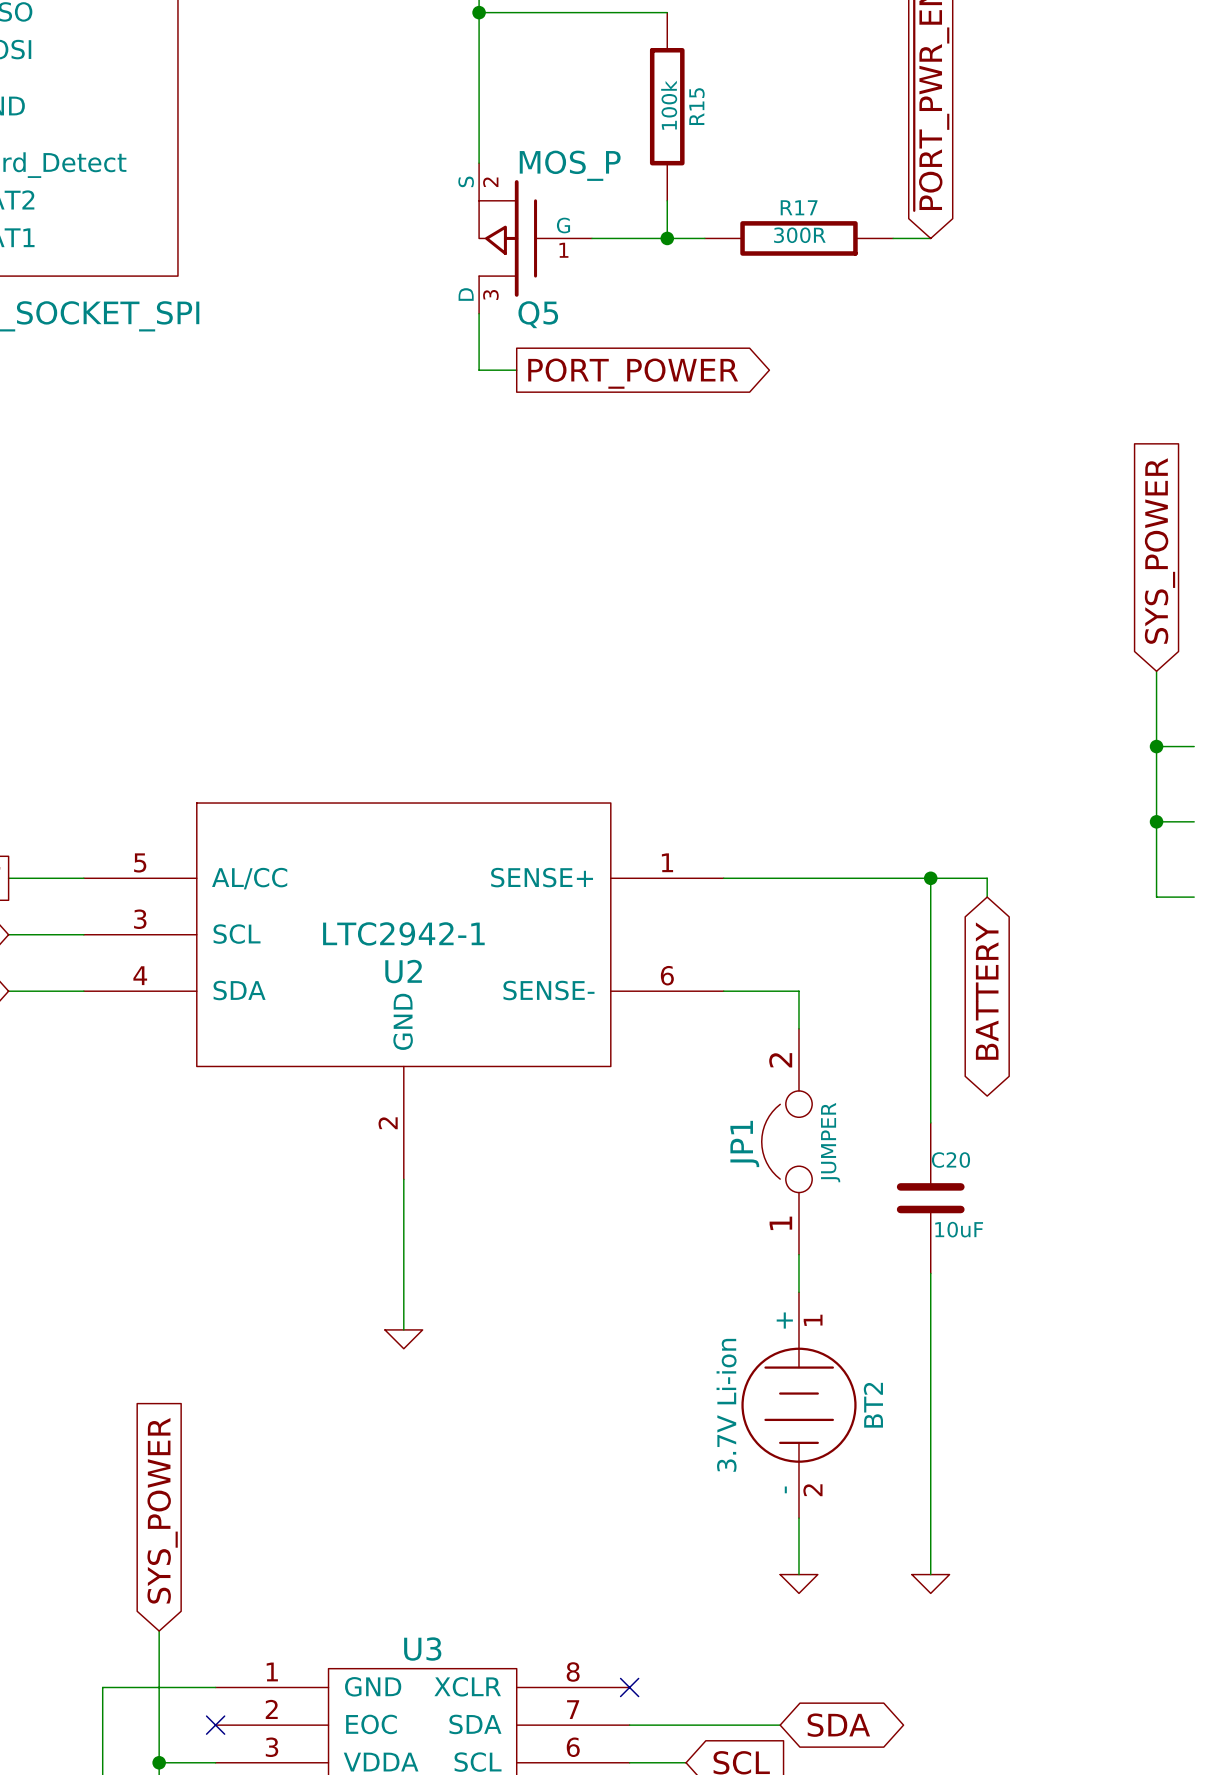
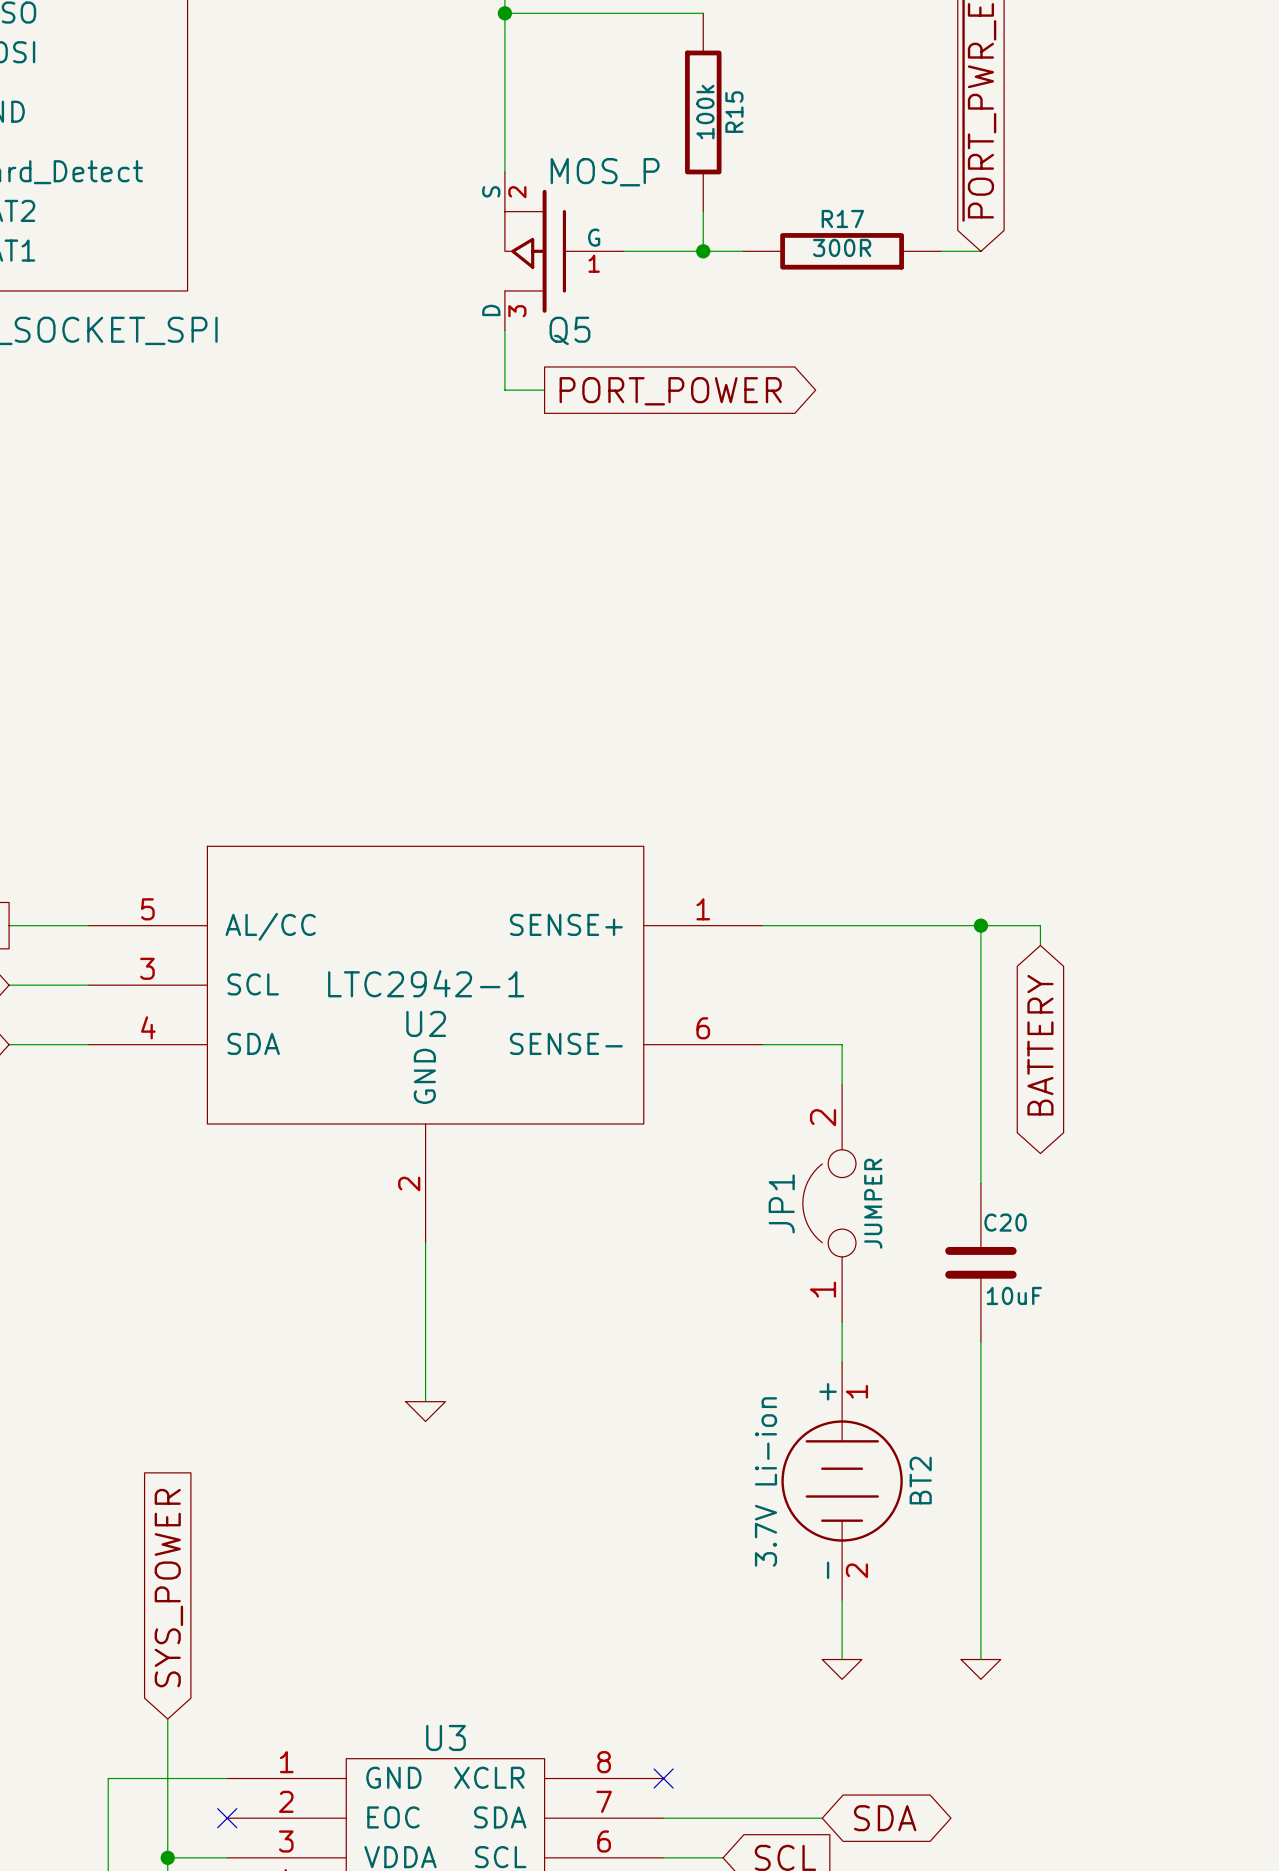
global label: SYS_POWER (1160, 551) -> none
wire: (1156, 671) (1156, 897) (1194, 897) -> none
wire: (1156, 746) (1194, 746) -> none
junction: (1156, 746) -> none
wire: (1156, 821) (1194, 821) -> none
junction: (1156, 821) -> none

